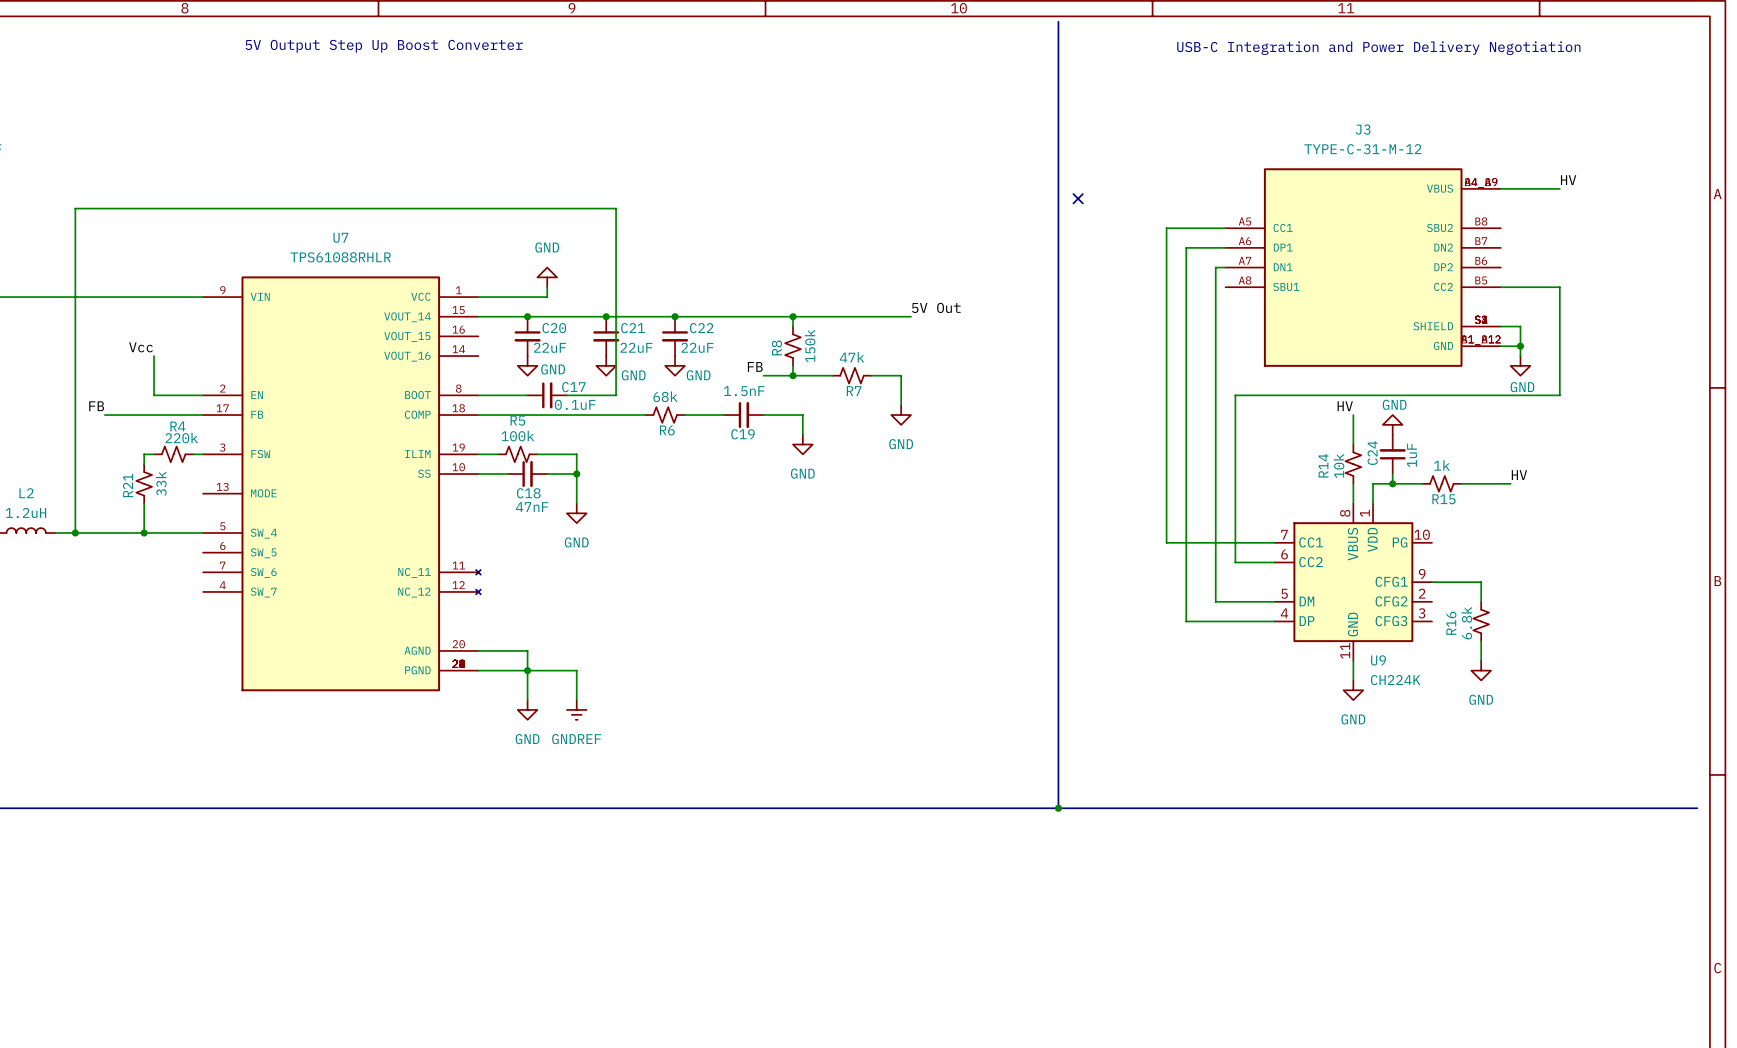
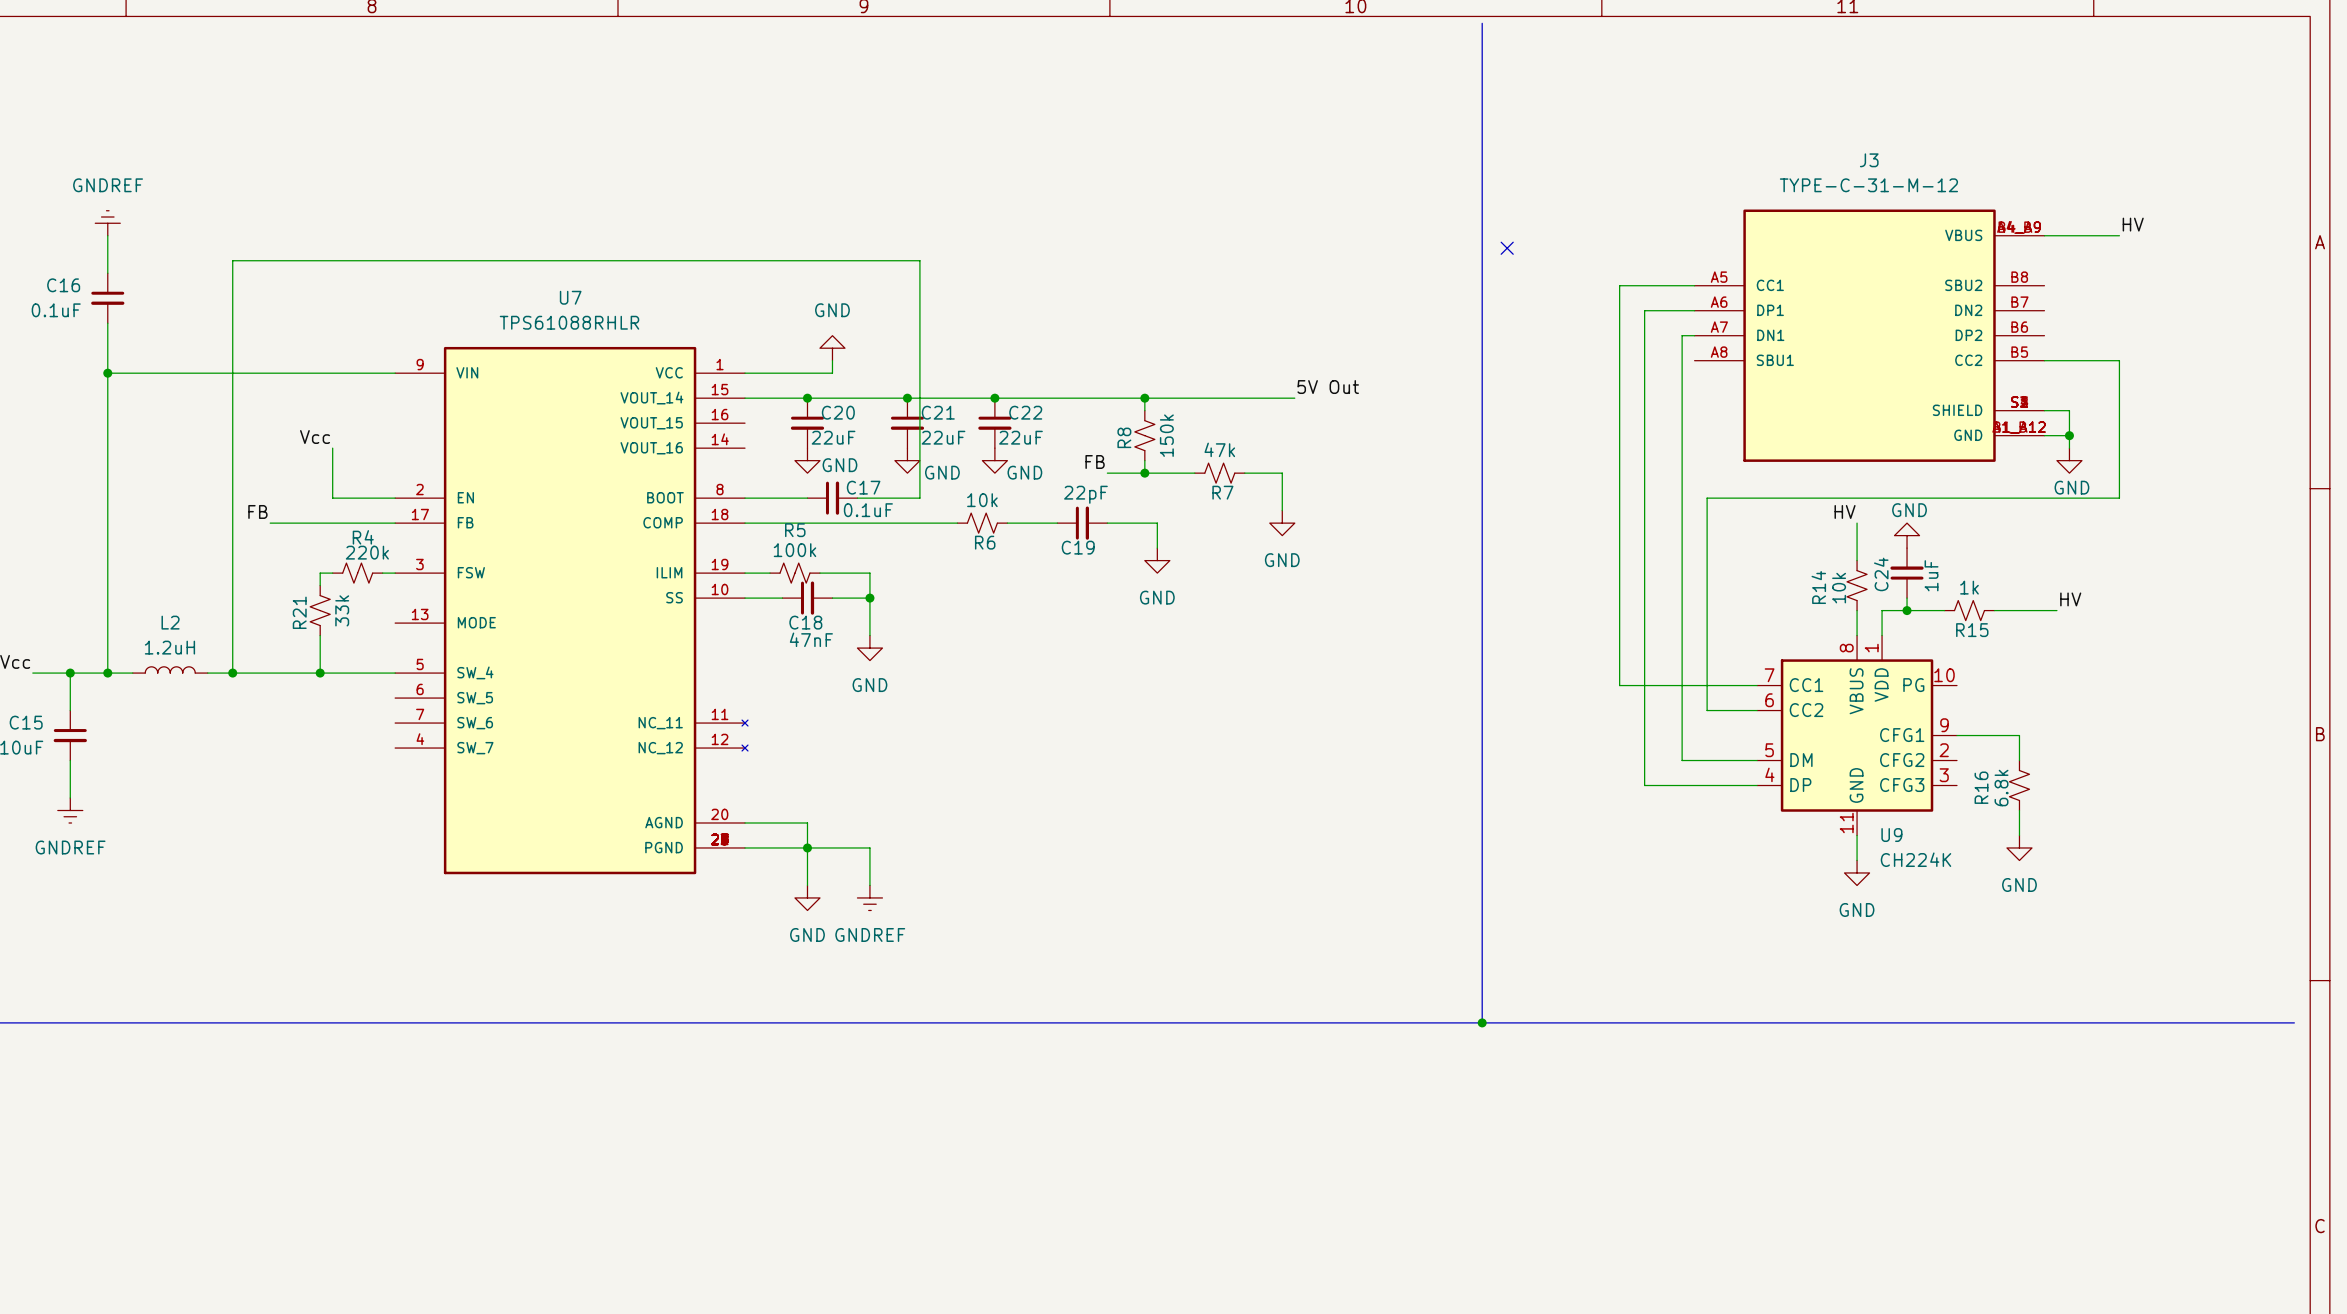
text: 5V Output Step Up Boost Converter (384, 46) -> none
text: USB-C Integration and Power Delivery Negotiation (1378, 48) -> none
C19 value: 1.5nF (744, 391) -> 22pF (1085, 494)
R6 value: 68k (665, 396) -> 10k (982, 500)

